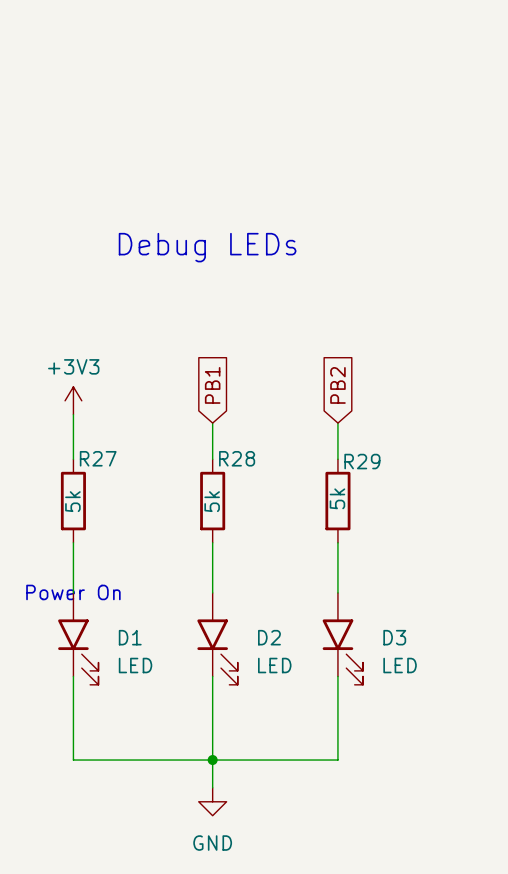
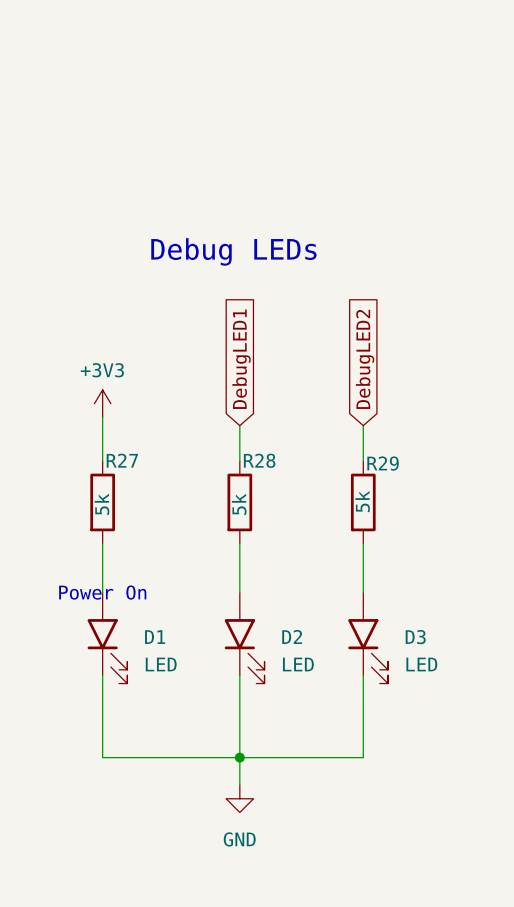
global label: PB1 (212, 385) -> DebugLED1 (241, 359)
global label: PB2 (337, 385) -> DebugLED2 (365, 359)

